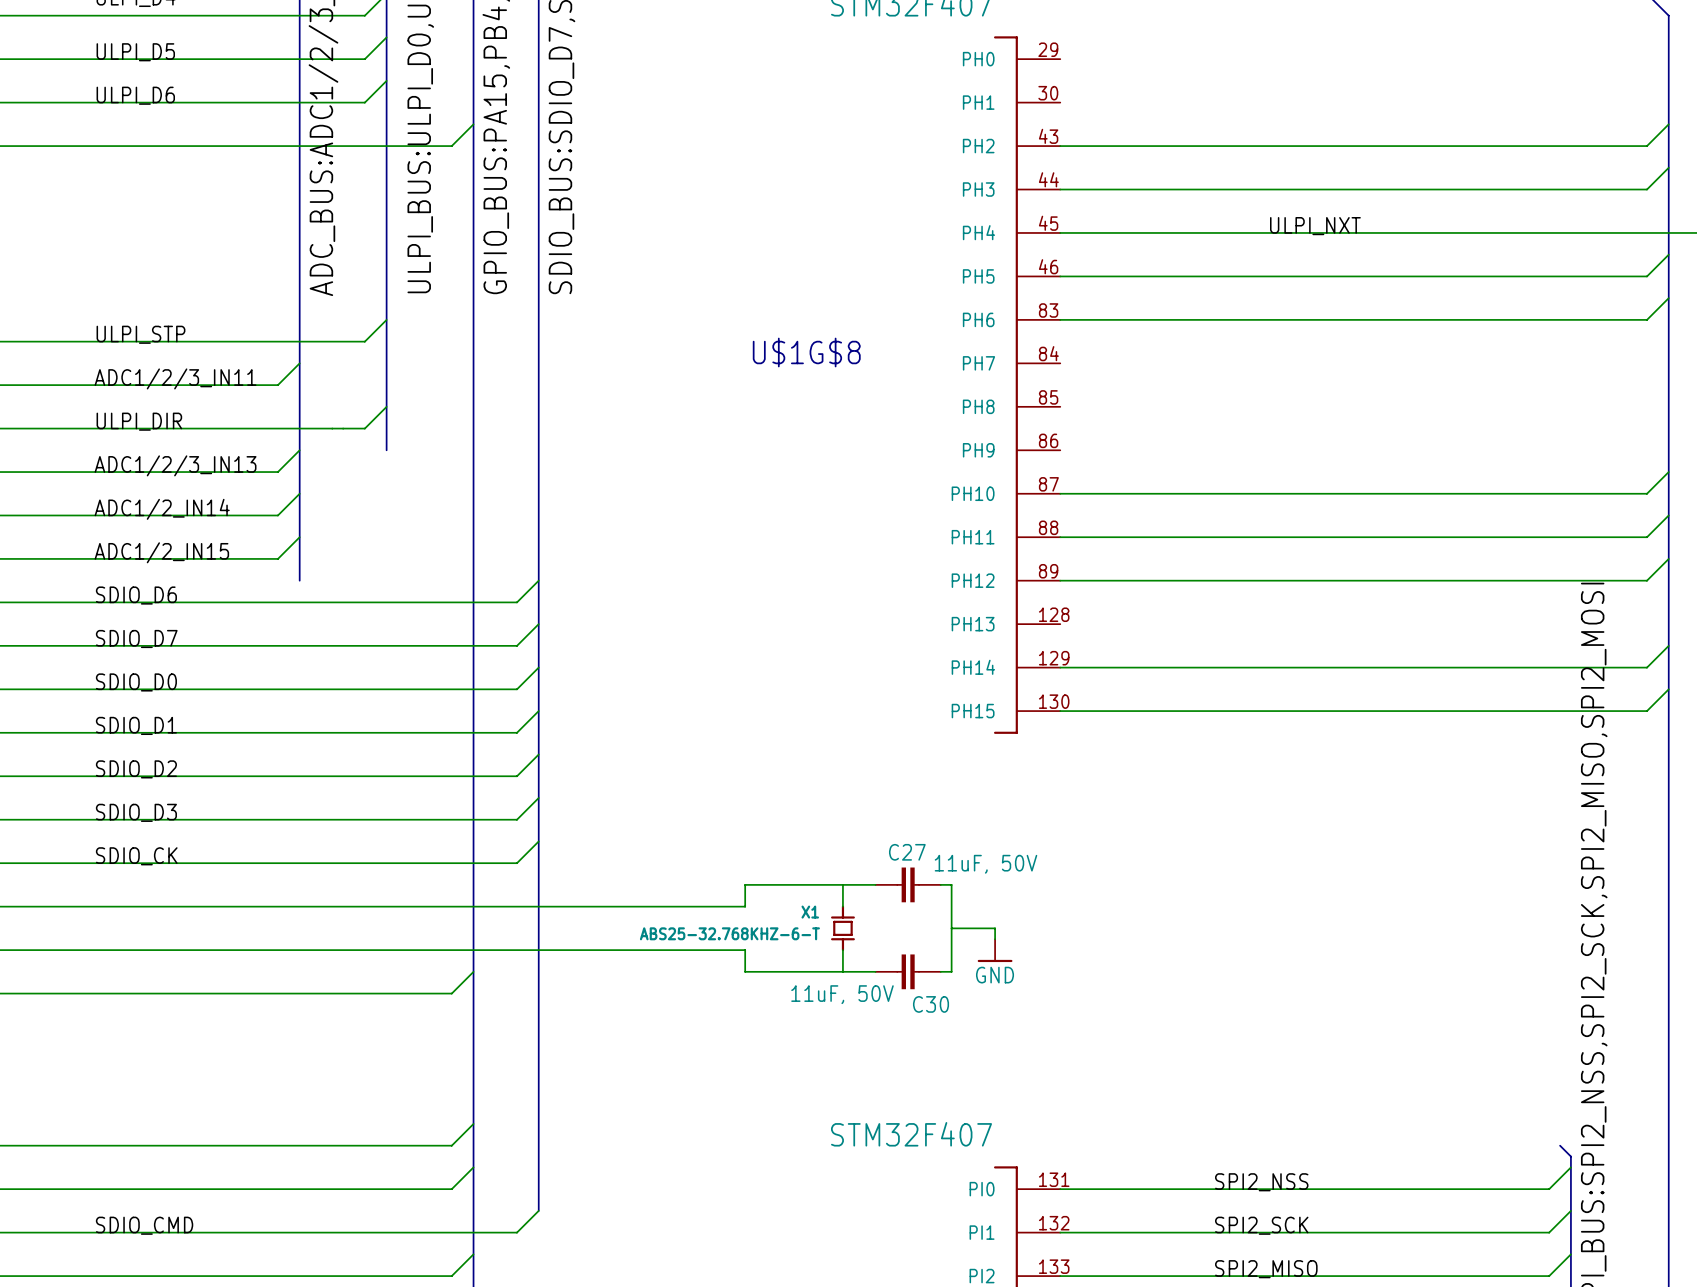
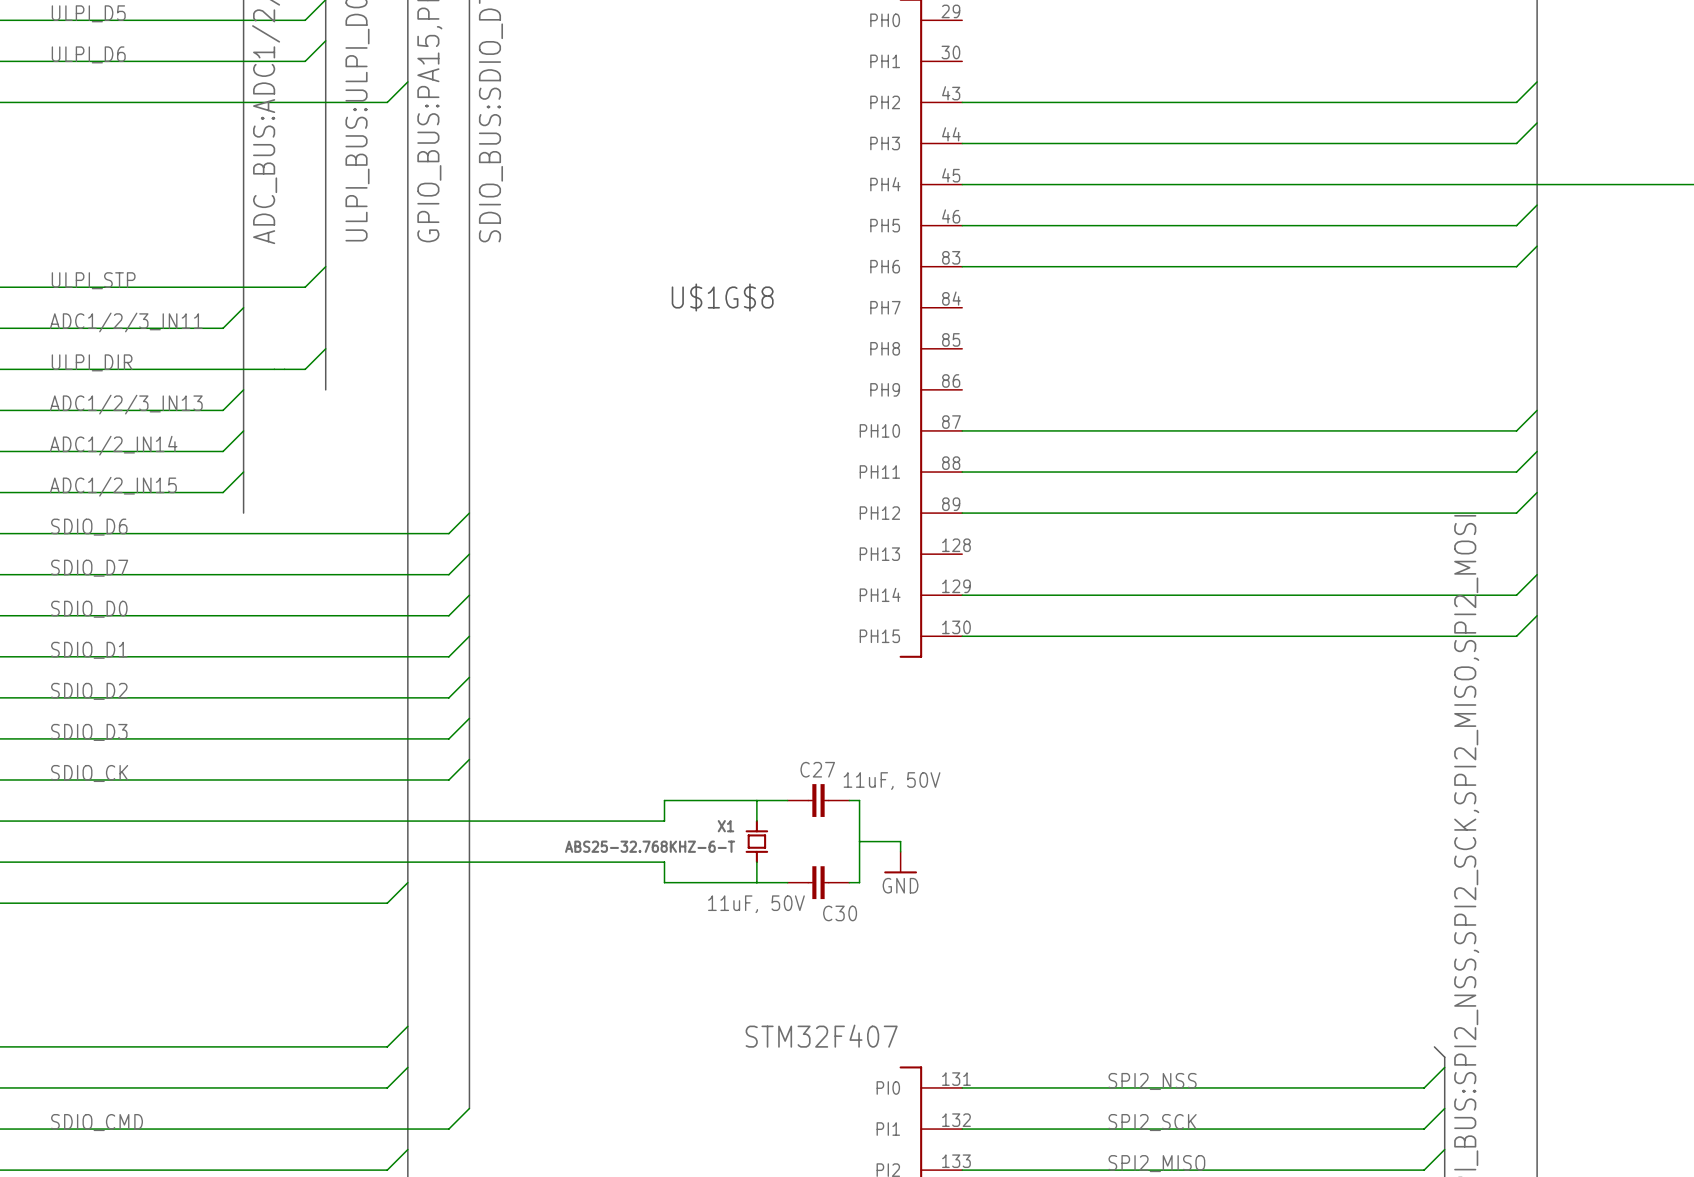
label: ULPI_NXT (1315, 226) -> none

